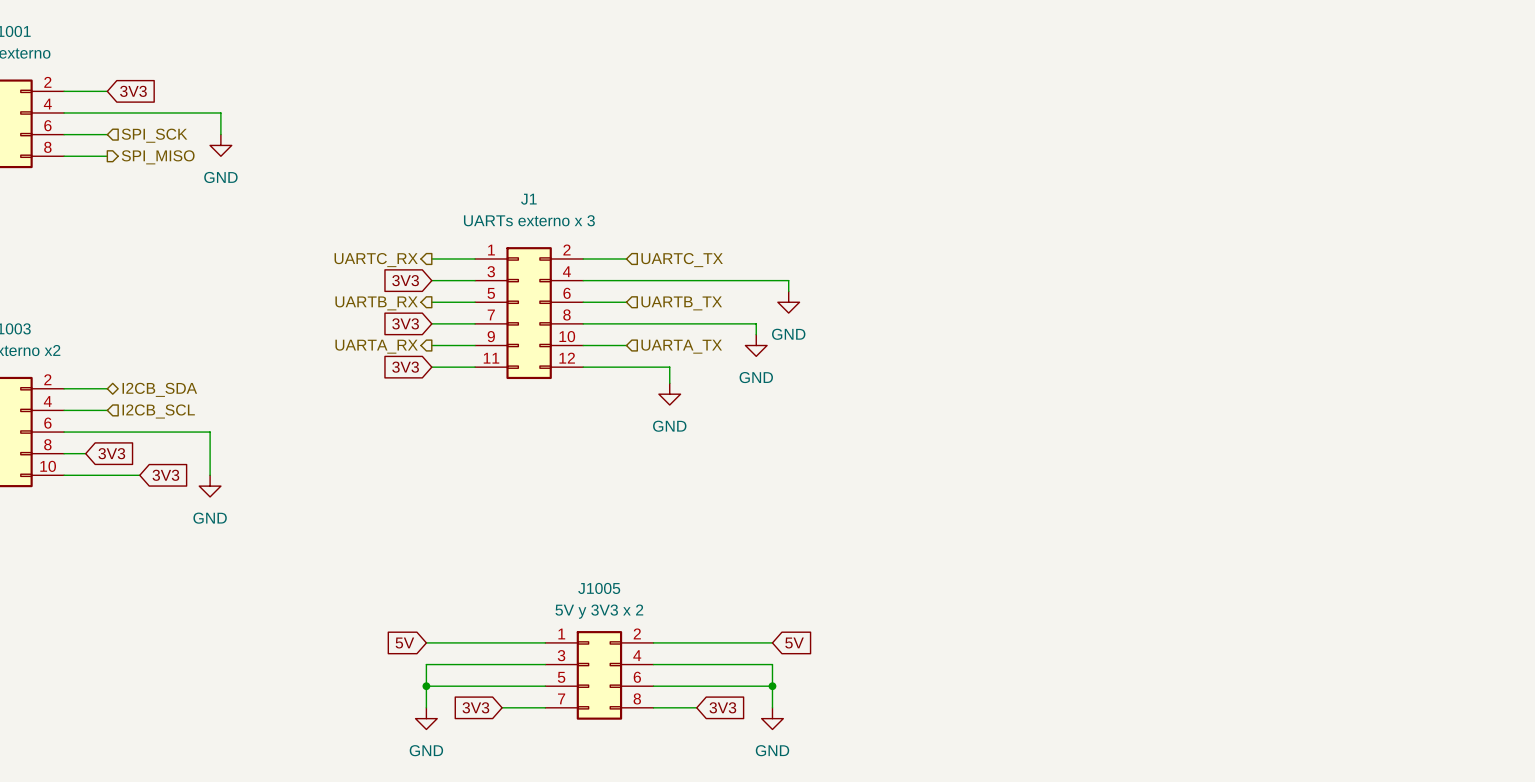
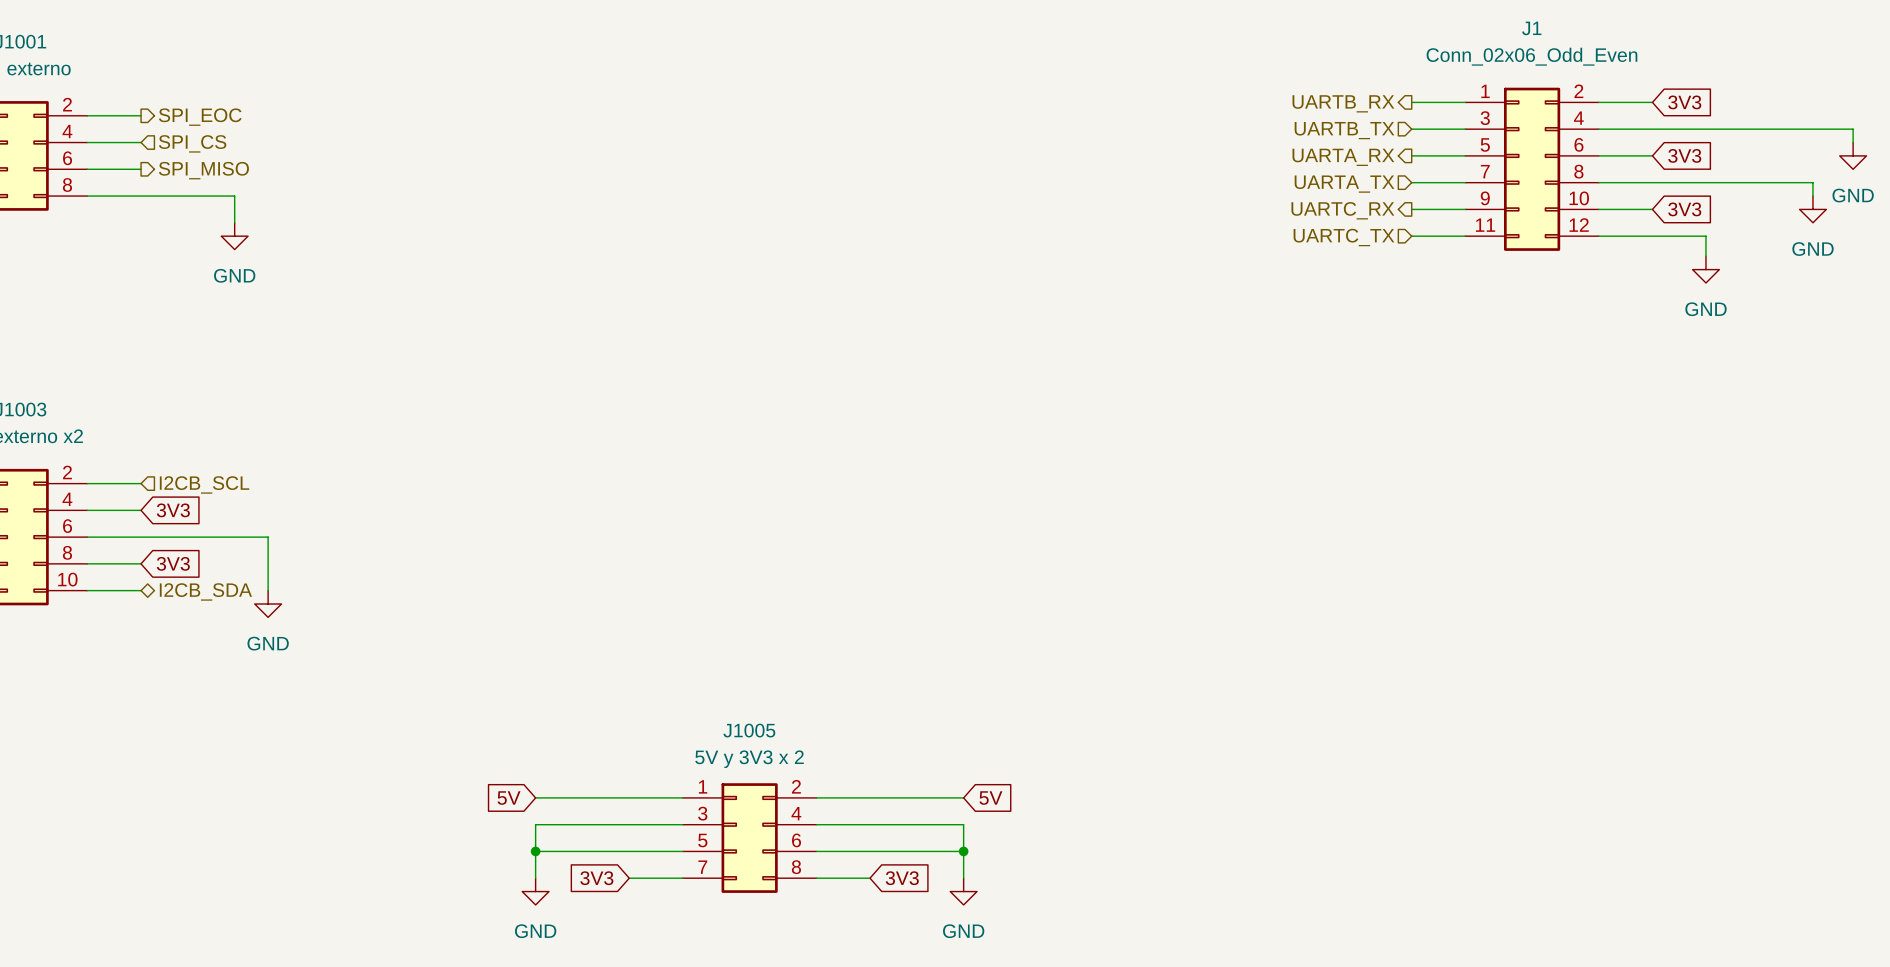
wire: none -> (1411, 102) (1465, 102)
wire: none -> (1598, 102) (1652, 102)
global label: none -> 3V3 (1684, 102)
hierarchical label: none -> UARTB_RX (1343, 103)
global label: 3V3 (133, 91) -> none
hierarchical label: none -> SPI_EOC (200, 117)
wire: none -> (1411, 129) (1465, 129)
wire: none -> (1598, 129) (1853, 129) (1853, 142)
hierarchical label: none -> UARTB_TX (1344, 130)
wire: (107, 112) (220, 112) (220, 134) -> none
hierarchical label: none -> SPI_CS (192, 143)
wire: none -> (1411, 155) (1465, 155)
wire: none -> (1598, 155) (1652, 155)
global label: none -> 3V3 (1684, 155)
power symbol: none -> GND (1853, 155)
hierarchical label: none -> UARTA_RX (1343, 157)
hierarchical label shape: input (154, 135) -> output (203, 170)
hierarchical label: SPI_SCK (154, 135) -> SPI_MISO (203, 170)
power symbol position: GND (220, 145) -> GND (234, 236)
wire: none -> (1411, 182) (1465, 182)
wire: none -> (1598, 182) (1812, 182) (1812, 196)
hierarchical label: none -> UARTA_TX (1344, 184)
wire: none -> (141, 196) (234, 196) (234, 222)
hierarchical label: SPI_MISO (158, 157) -> none
wire: none -> (1411, 209) (1465, 209)
wire: none -> (1598, 209) (1652, 209)
global label: none -> 3V3 (1684, 209)
power symbol: none -> GND (1812, 209)
hierarchical label: none -> UARTC_RX (1342, 210)
wire: none -> (1411, 236) (1465, 236)
wire: none -> (1598, 236) (1705, 236) (1705, 256)
hierarchical label: none -> UARTC_TX (1343, 237)
power symbol: none -> GND (1705, 269)
J1 value: UARTs externo x 3 (529, 220) -> Conn_02x06_Odd_Even (1531, 56)
wire: (431, 258) (475, 258) -> none
wire: (583, 258) (626, 258) -> none
hierarchical label: UARTC_RX (376, 260) -> none
hierarchical label: UARTC_TX (682, 260) -> none
global label: 3V3 (405, 280) -> none
wire: (431, 280) (475, 280) -> none
wire: (583, 280) (788, 280) (788, 291) -> none
wire: (431, 302) (475, 302) -> none
wire: (583, 302) (626, 302) -> none
power symbol: GND (788, 302) -> none
hierarchical label: UARTB_RX (376, 303) -> none
hierarchical label: UARTB_TX (681, 303) -> none
J1 position: (529, 313) -> (1532, 169)
global label: 3V3 (405, 323) -> none
wire: (431, 323) (475, 323) -> none
wire: (583, 323) (756, 323) (756, 334) -> none
wire: (431, 345) (475, 345) -> none
wire: (583, 345) (626, 345) -> none
power symbol: GND (756, 345) -> none
hierarchical label: UARTA_RX (376, 346) -> none
hierarchical label: UARTA_TX (681, 346) -> none
global label: 3V3 (405, 367) -> none
wire: (431, 367) (475, 367) -> none
wire: (583, 367) (669, 367) (669, 383) -> none
hierarchical label shape: bidirectional (159, 389) -> input (204, 484)
hierarchical label: I2CB_SDA (159, 389) -> I2CB_SCL (204, 484)
power symbol: GND (669, 394) -> none
global label: none -> 3V3 (173, 510)
hierarchical label: I2CB_SCL (158, 411) -> none
wire: none -> (114, 563) (141, 563)
global label: 3V3 (111, 453) -> none
global label: none -> 3V3 (173, 563)
wire: (107, 475) (139, 475) -> none
global label: 3V3 (165, 475) -> none
hierarchical label: none -> I2CB_SDA (205, 591)

